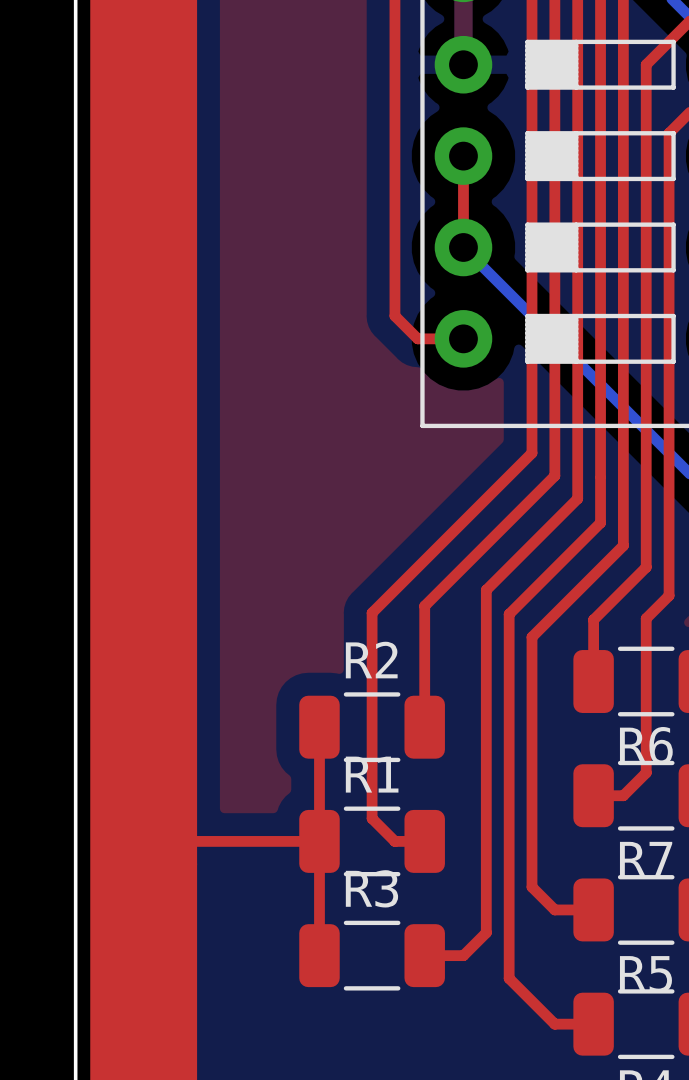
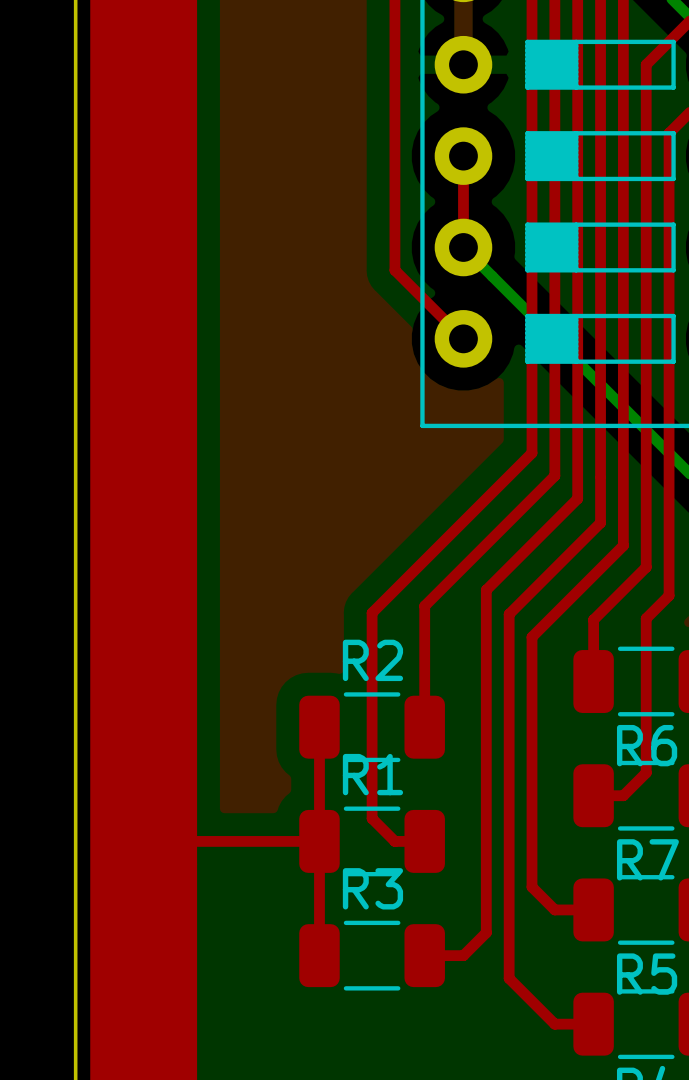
top track: (394, 270) (394, 316) (417, 338) (463, 338) -> (394, 270) (463, 338)

